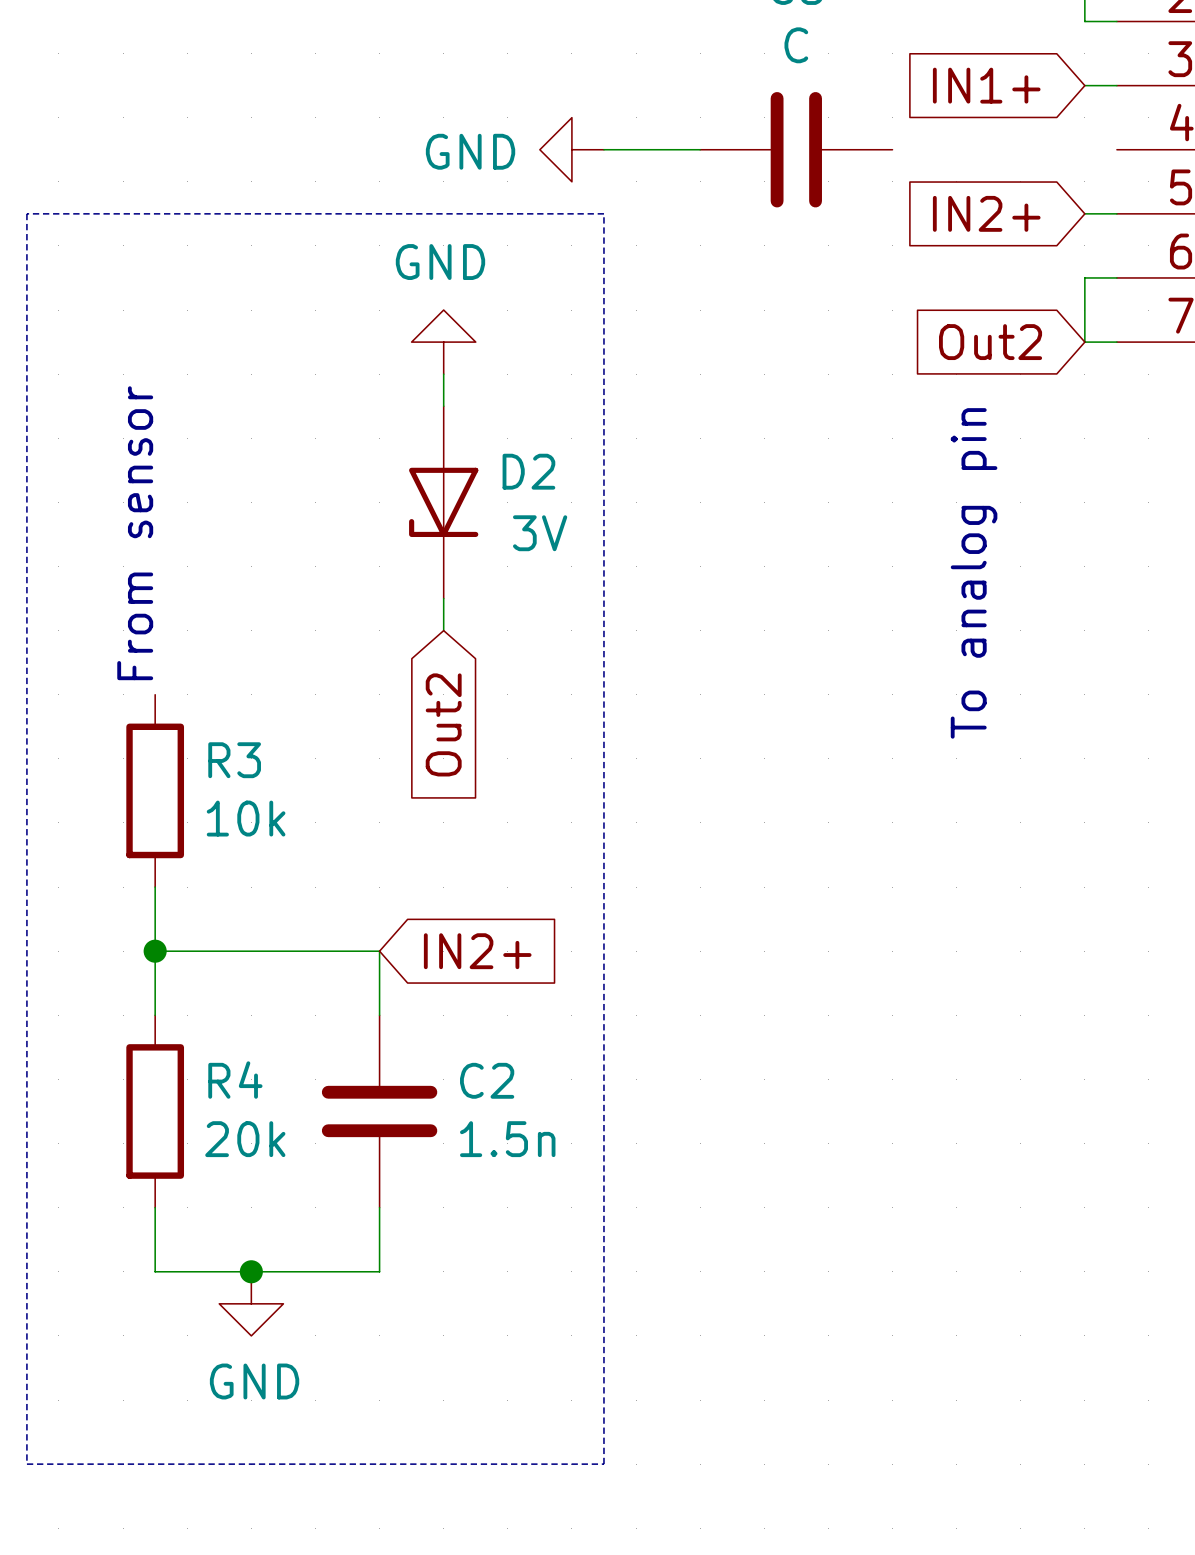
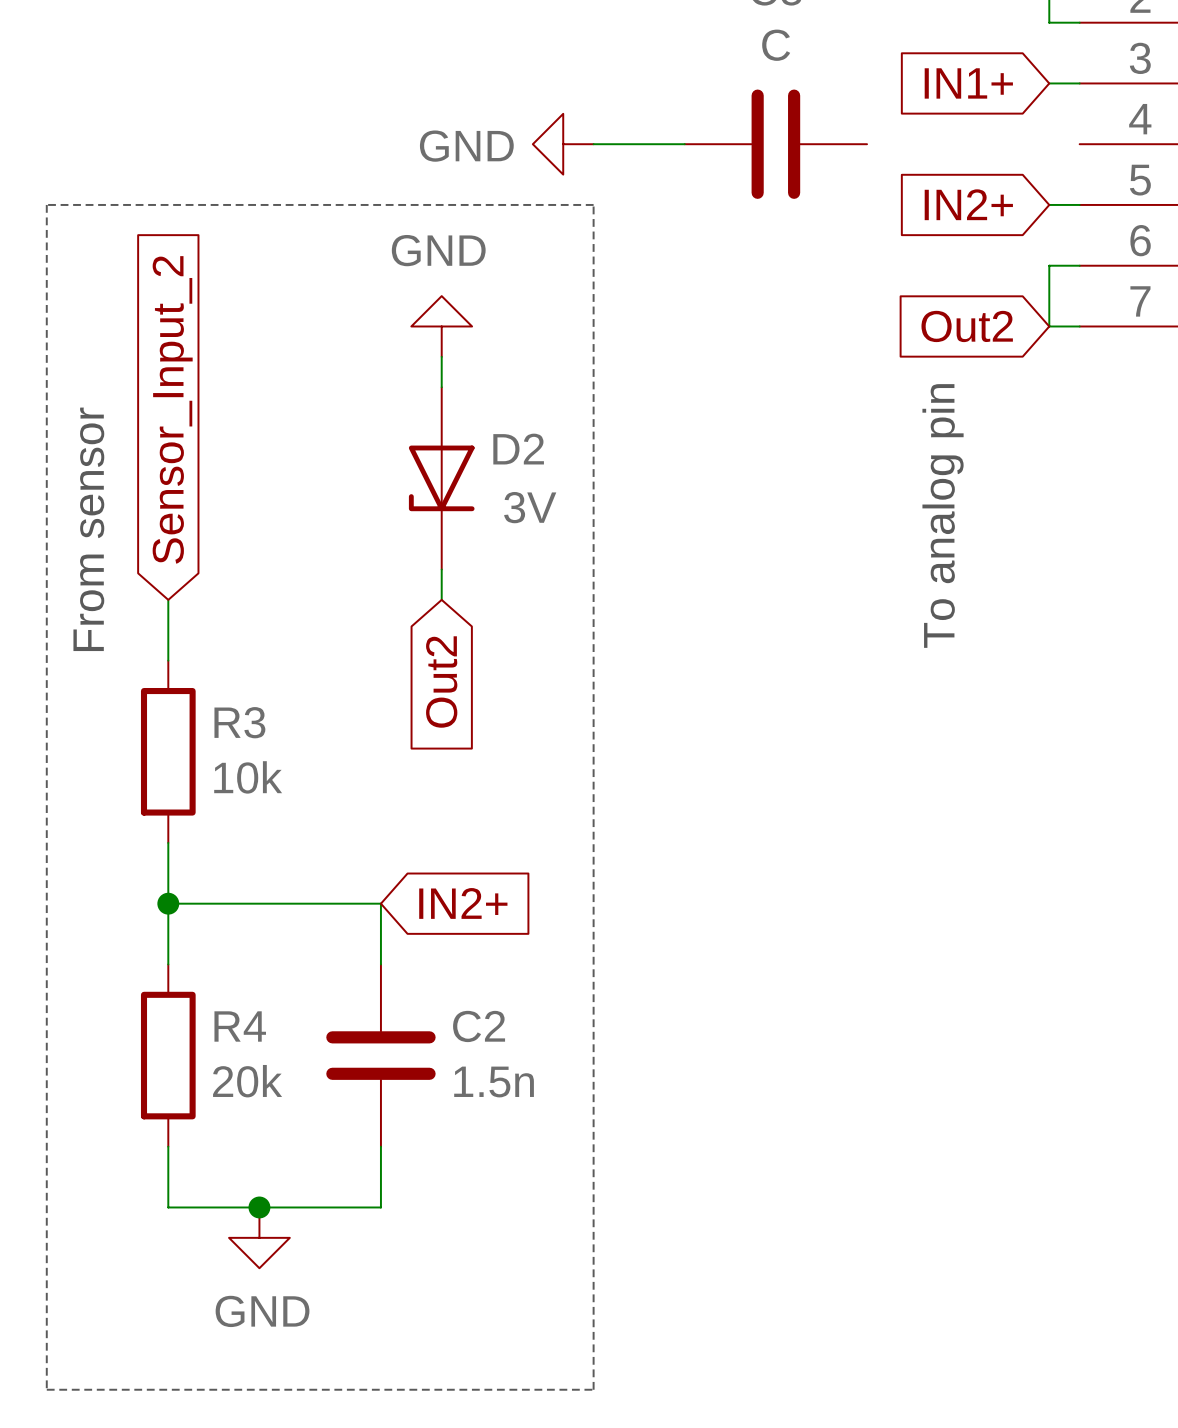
global label: none -> Sensor_Input_2 (172, 409)
text position: From sensor (135, 533) -> From sensor (88, 529)
wire: none -> (168, 599) (168, 660)

